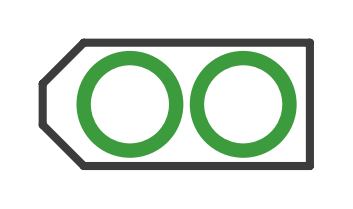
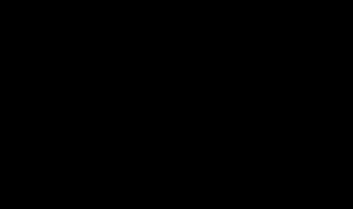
part: (176, 104) -> none

